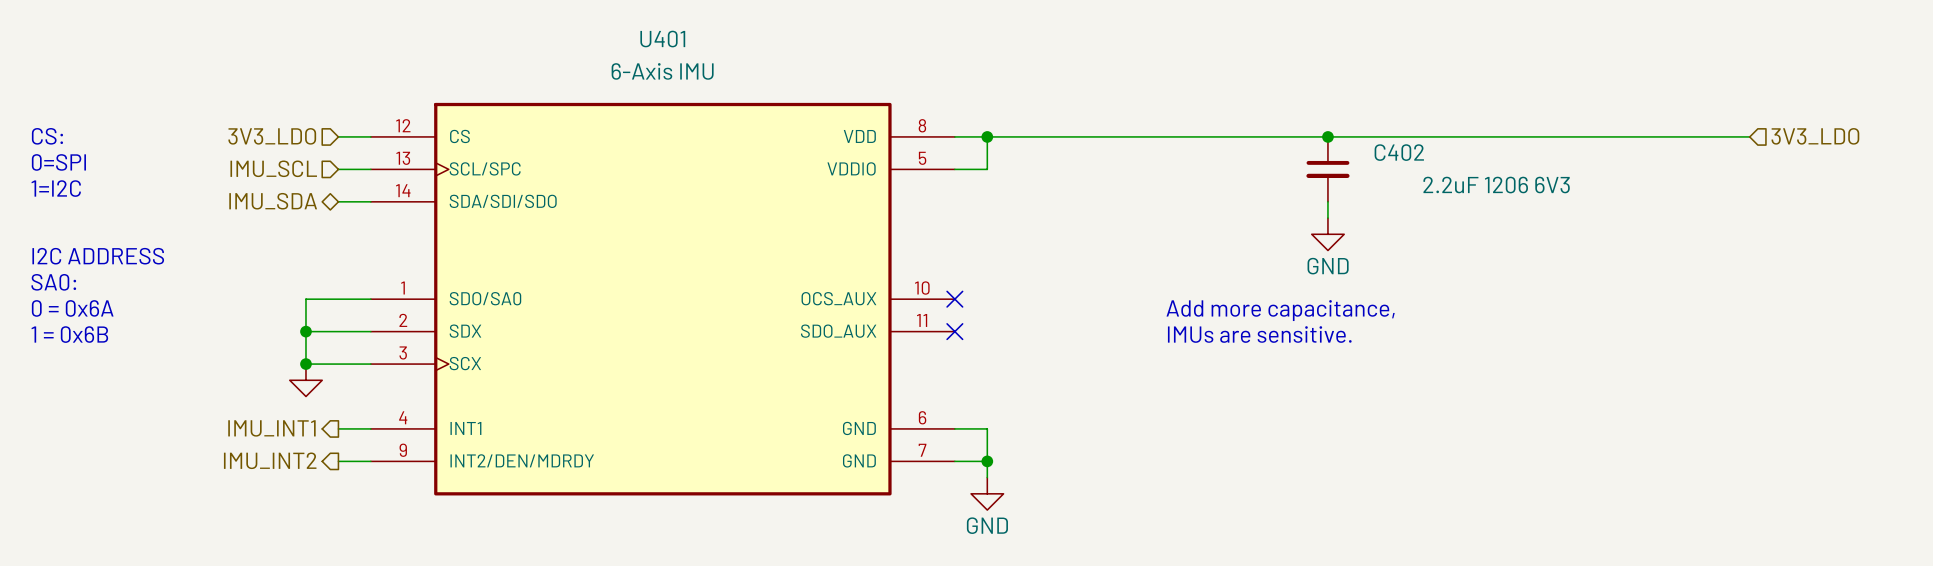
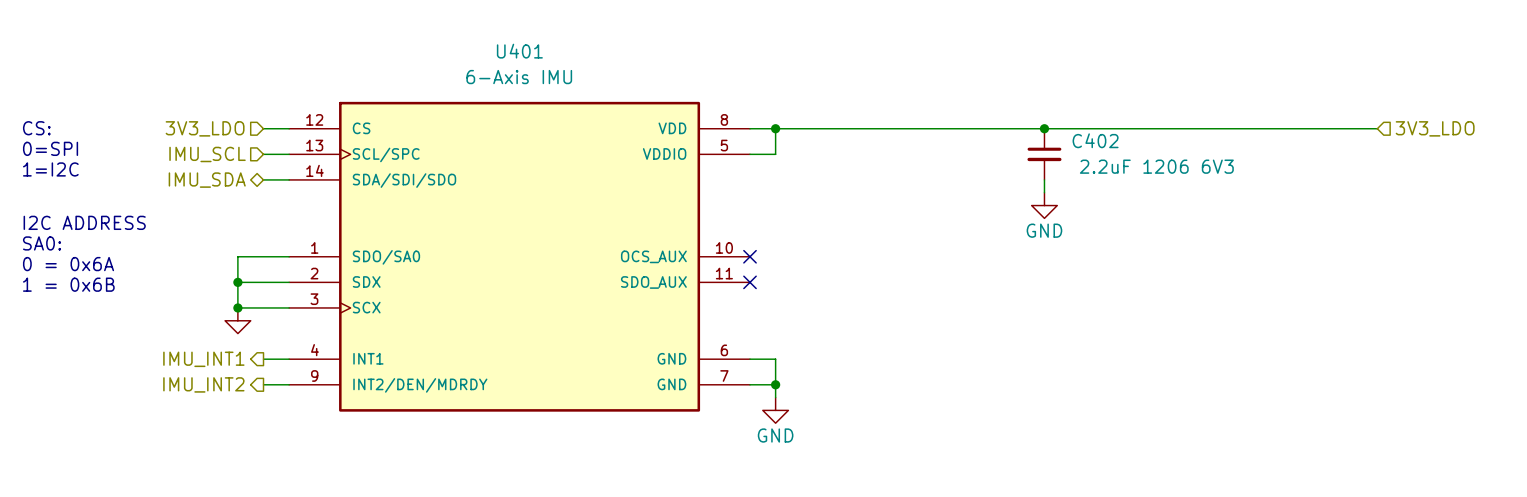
text: Add more capacitance, (1280, 310) -> none
text: IMUs are sensitive. (1259, 334) -> none

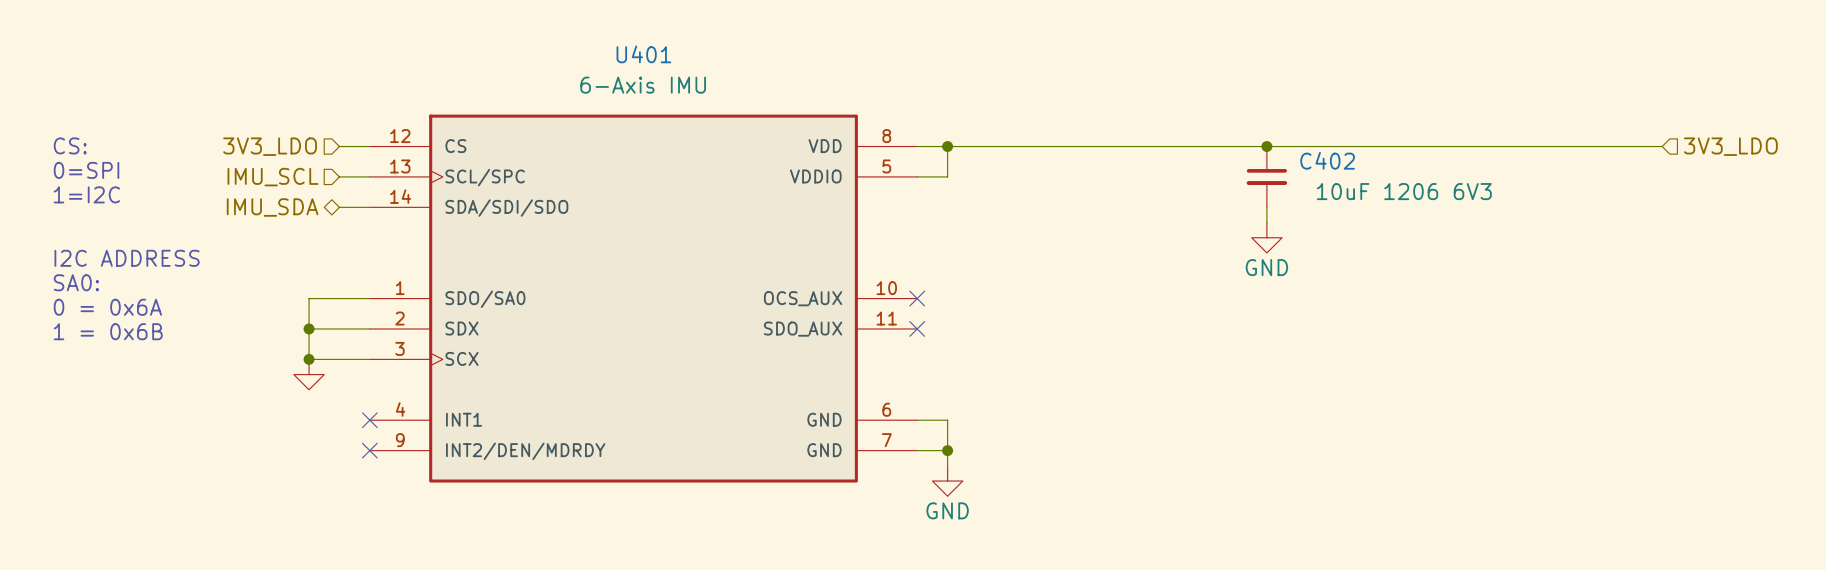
C402 value: 2.2uF 1206 6V3 (1156, 166) -> 10uF 1206 6V3 (1404, 191)
hierarchical label: IMU_INT1 (203, 359) -> none
wire: (263, 359) (289, 359) -> none
no-connect mark: none -> (369, 420)
hierarchical label: IMU_INT2 (203, 384) -> none
wire: (263, 384) (289, 384) -> none
no-connect mark: none -> (369, 450)

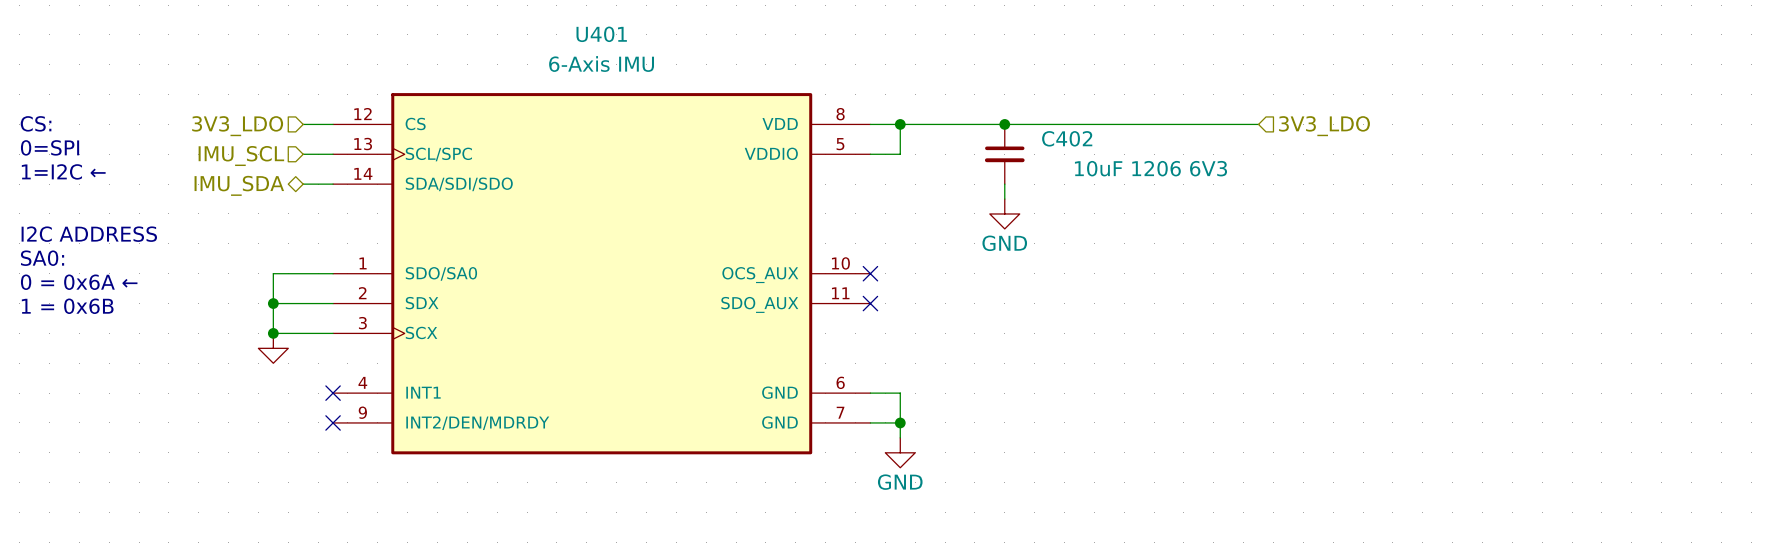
junction: none -> (1004, 124)
junction: (1266, 146) -> none
wire: (1312, 146) (1662, 146) -> none
hierarchical label: none -> 3V3_LDO (1324, 126)
hierarchical label: 3V3_LDO (1730, 146) -> none
C402 position: (1266, 176) -> (1004, 154)
text: 1=I2C (86, 194) -> 1=I2C ← (63, 171)
wire: (1266, 207) (1266, 222) -> (1004, 184) (1004, 199)
power symbol position: GND (1266, 237) -> GND (1004, 213)
text: 0 = 0x6A (107, 307) -> 0 = 0x6A ← (79, 282)

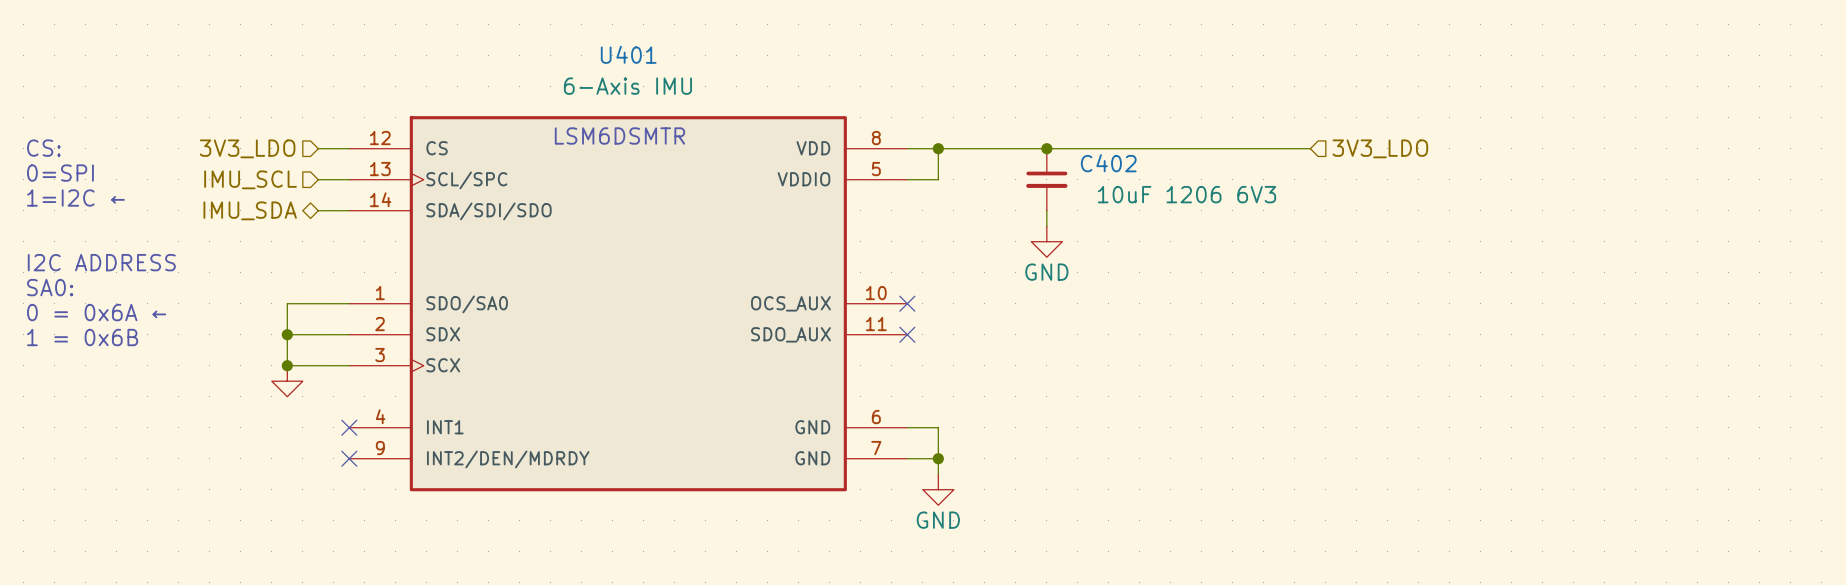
text: none -> LSM6DSMTR (619, 136)

